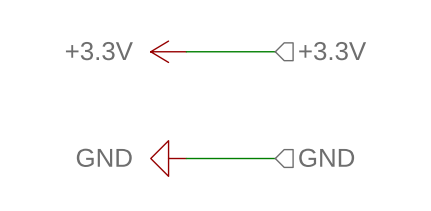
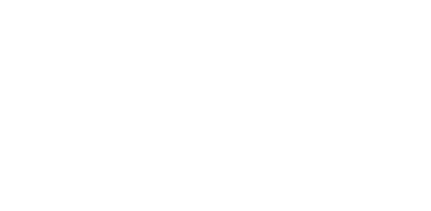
power symbol: +3.3V (168, 51) -> none
wire: (186, 51) (275, 51) -> none
hierarchical label: +3.3V (332, 51) -> none
hierarchical label: GND (326, 157) -> none
power symbol: GND (168, 158) -> none
wire: (186, 158) (275, 158) -> none

